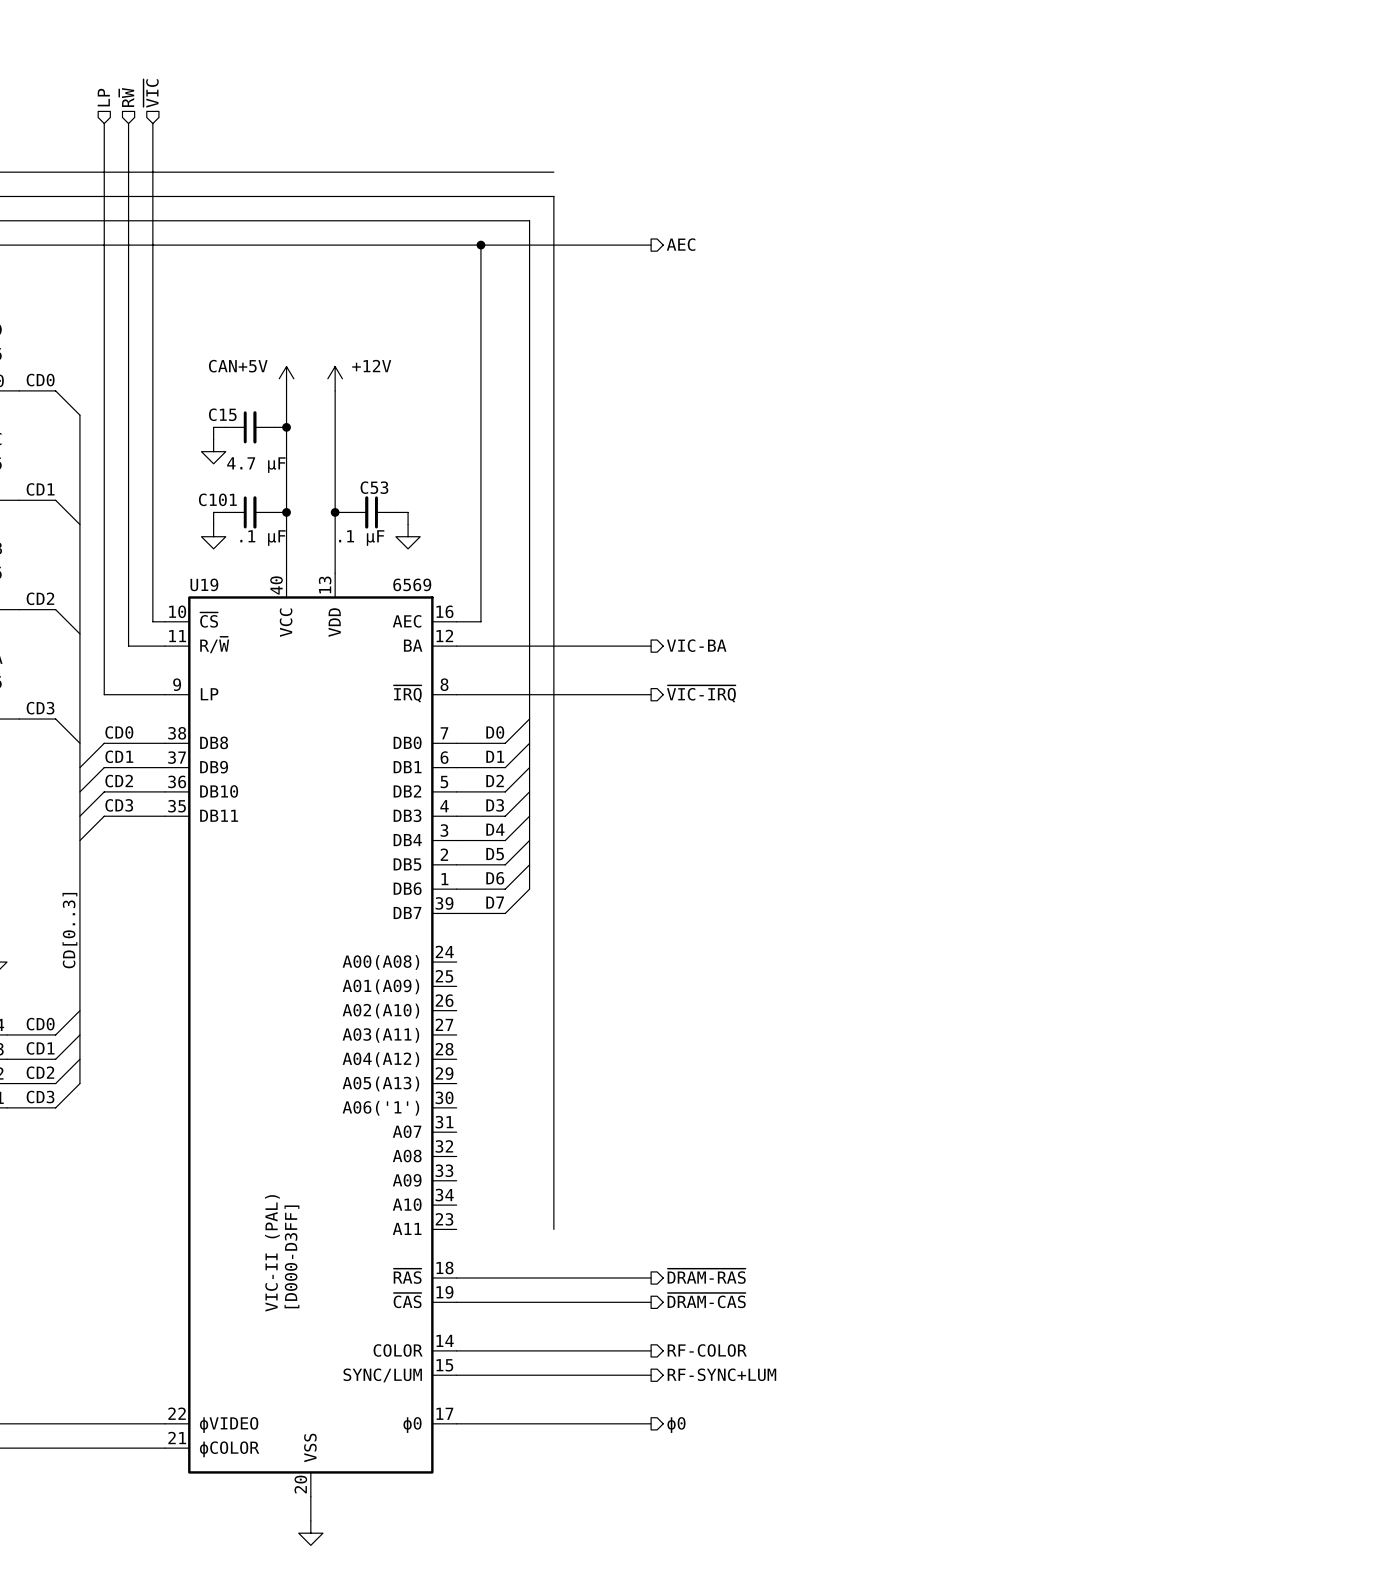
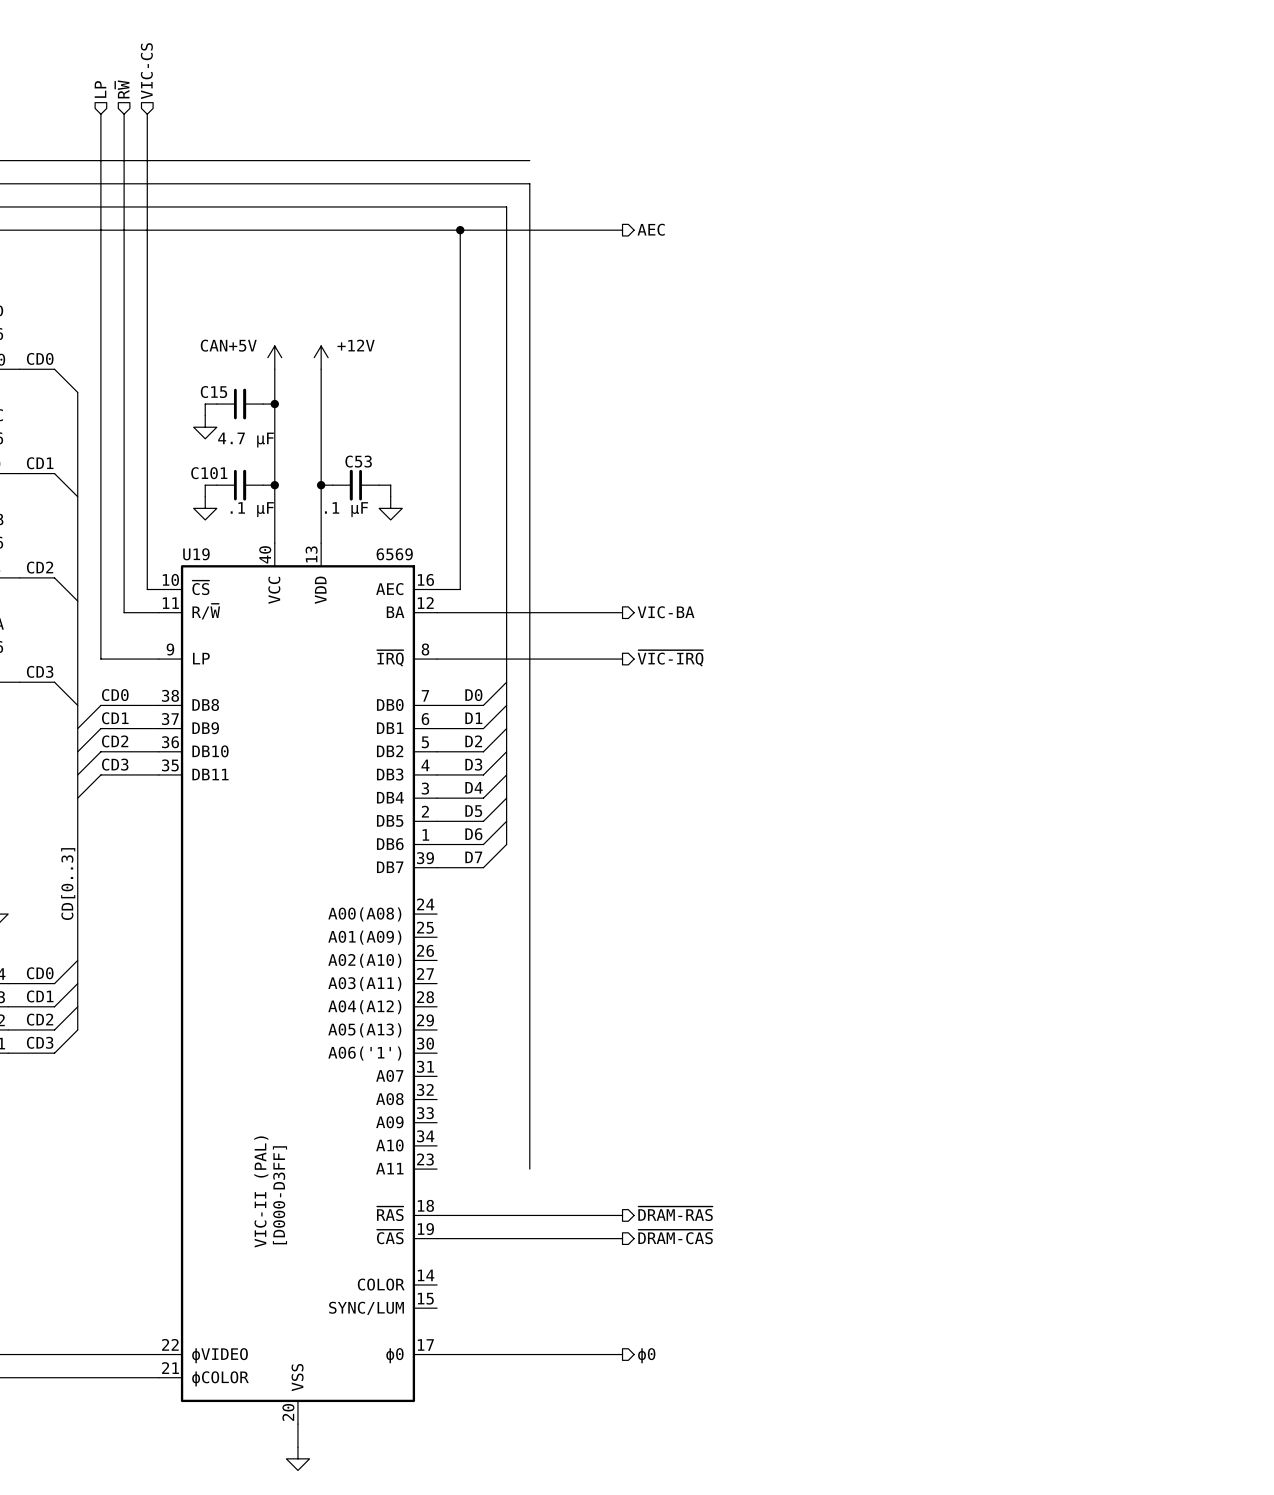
hierarchical label: ~{VIC} (151, 93) -> VIC-CS (146, 71)
wire: (456, 1350) (651, 1350) -> none
hierarchical label: RF-COLOR (707, 1350) -> none
hierarchical label: RF-SYNC+LUM (721, 1374) -> none
wire: (456, 1375) (651, 1375) -> none

